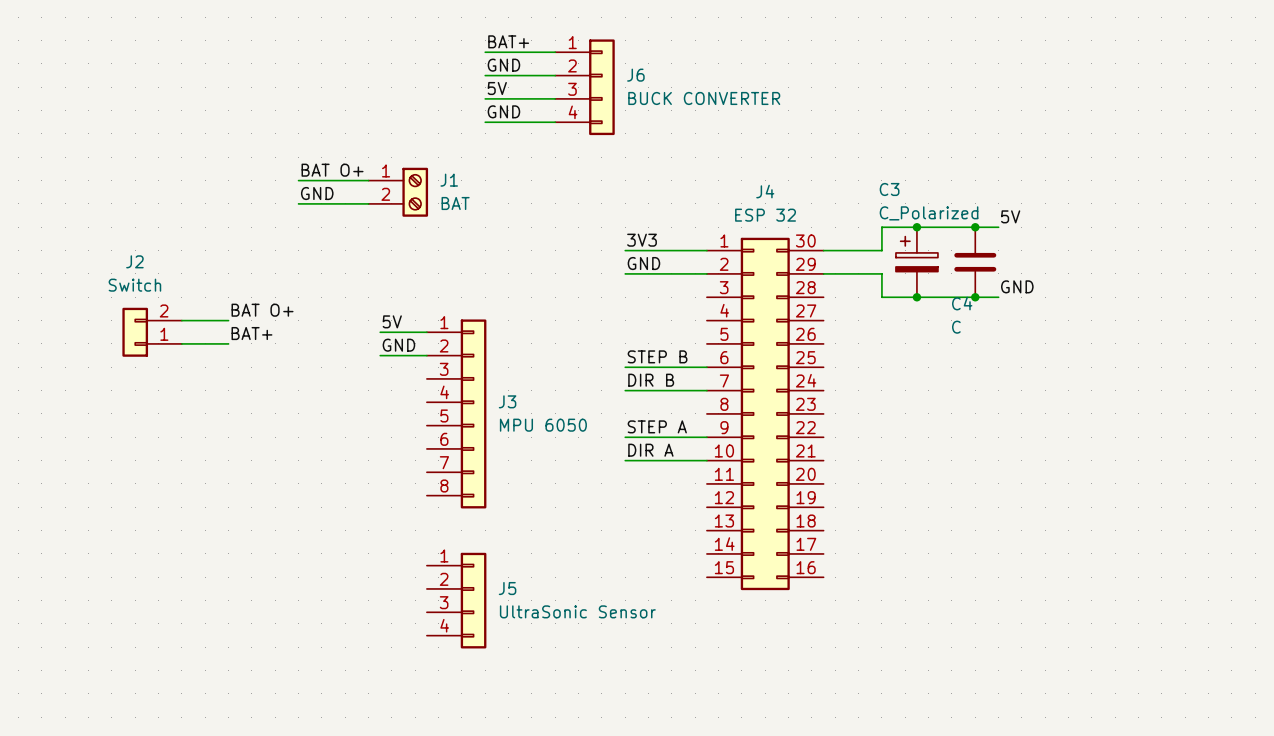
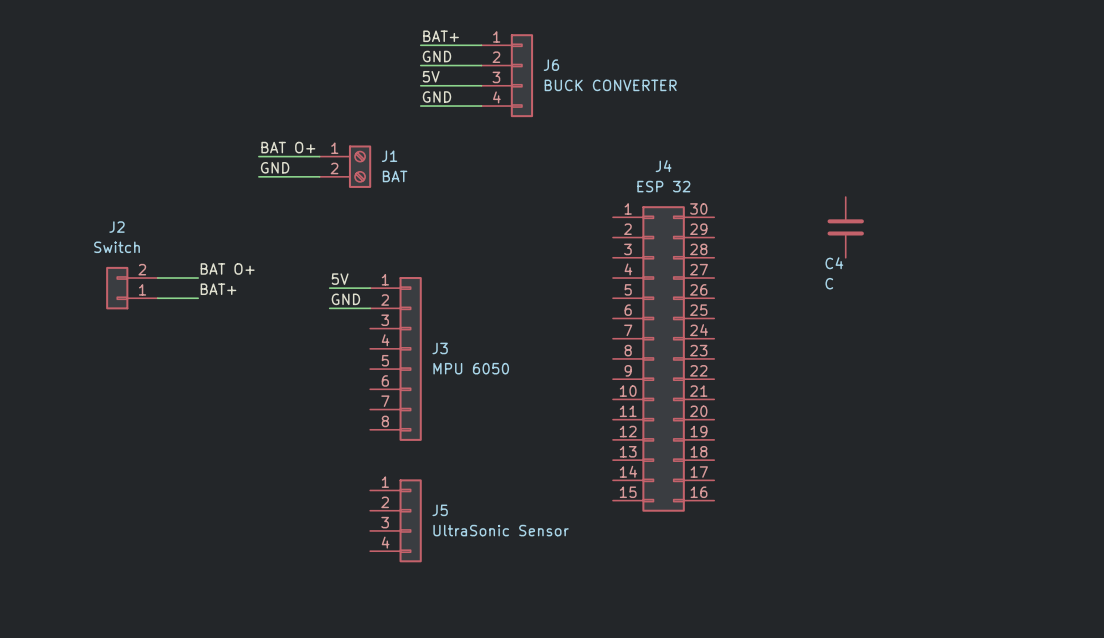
label: 5V (1010, 216) -> none
junction: (916, 227) -> none
junction: (975, 227) -> none
wire: (998, 227) (881, 227) (881, 250) (823, 250) -> none
label: 3V3 (642, 240) -> none
wire: (625, 250) (706, 250) -> none
C3: C_Polarized (916, 262) -> none
label: GND (643, 263) -> none
wire: (625, 273) (706, 273) -> none
wire: (823, 273) (881, 273) (881, 297) (998, 297) -> none
label: GND (1017, 286) -> none
junction: (916, 297) -> none
junction: (975, 297) -> none
label: STEP B (657, 356) -> none
wire: (625, 367) (706, 367) -> none
label: DIR B (651, 380) -> none
wire: (625, 390) (706, 390) -> none
label: STEP A (657, 426) -> none
wire: (625, 437) (706, 437) -> none
label: DIR A (650, 450) -> none
wire: (625, 460) (706, 460) -> none

